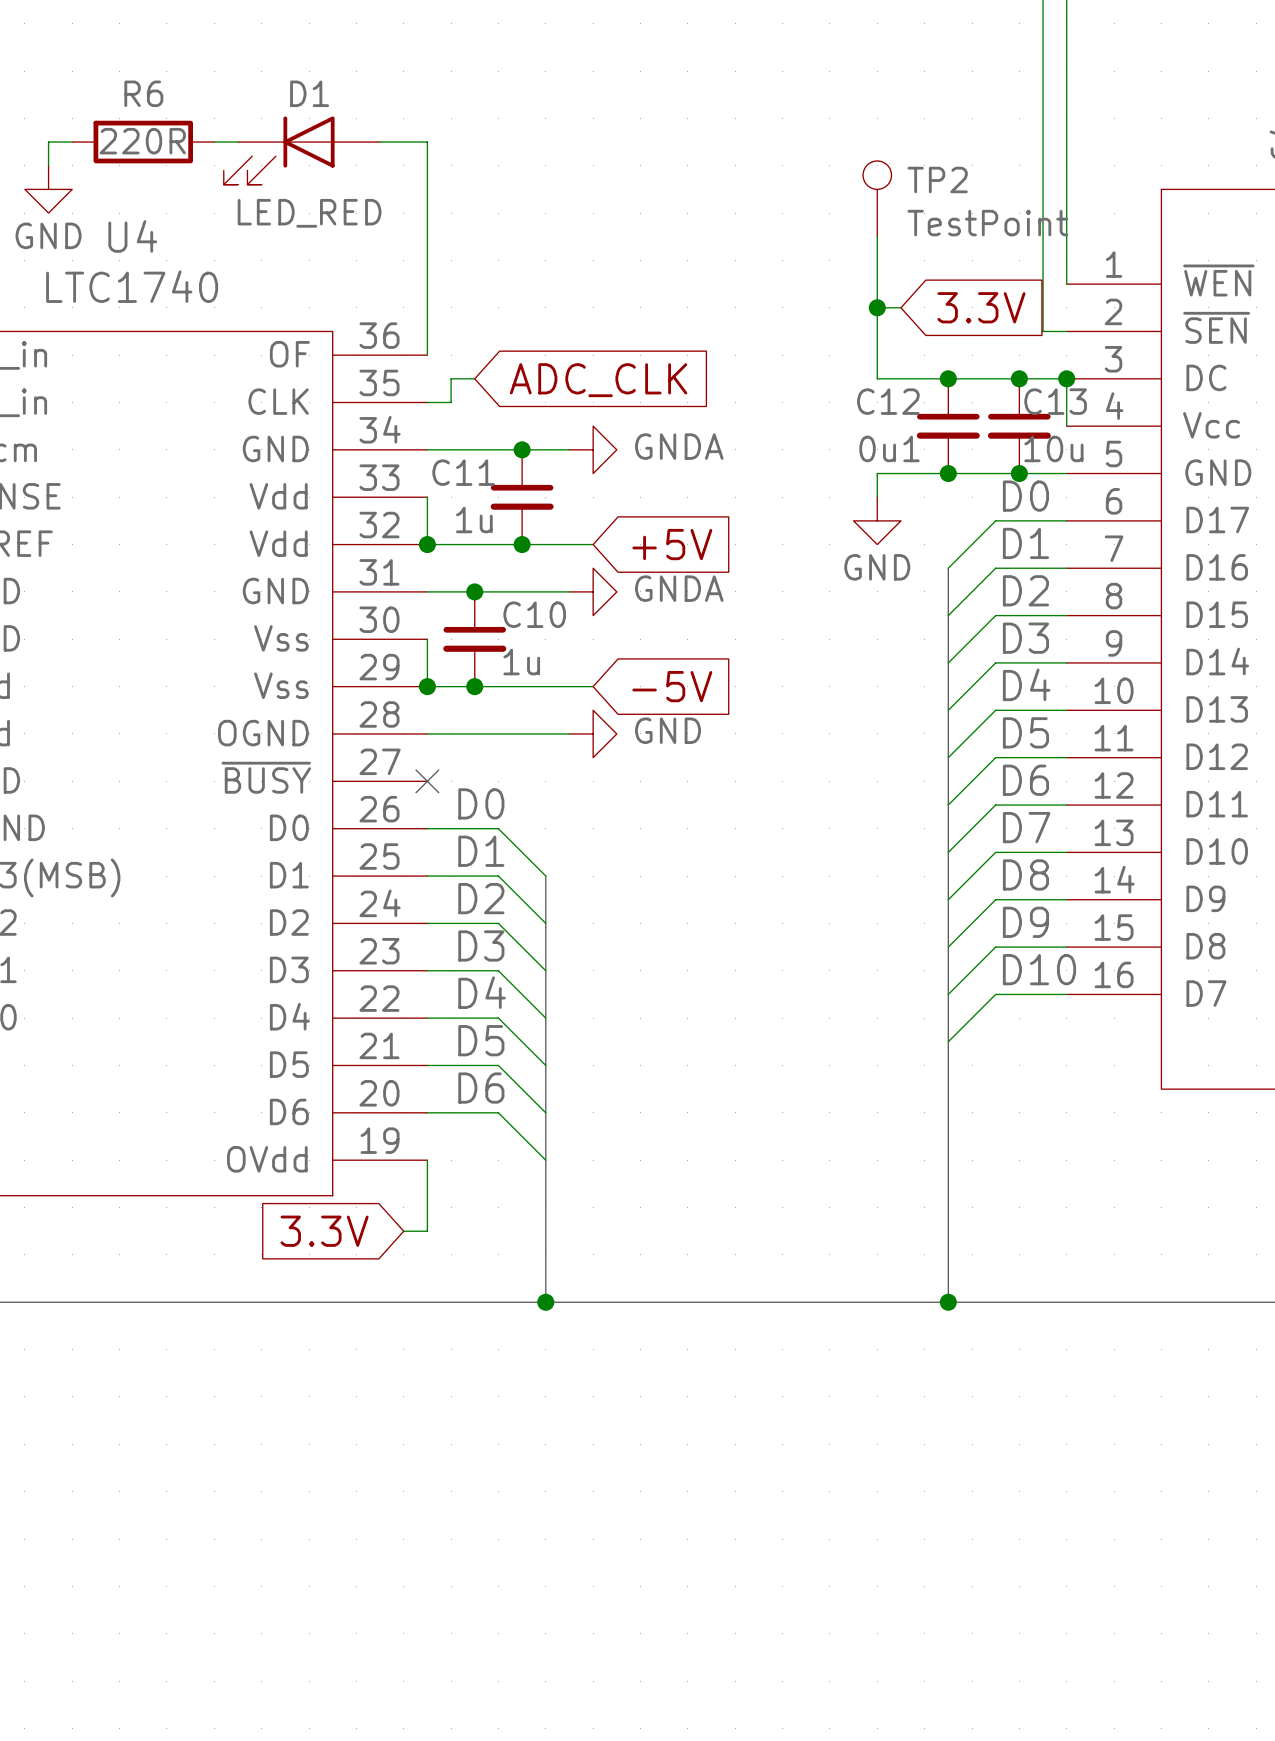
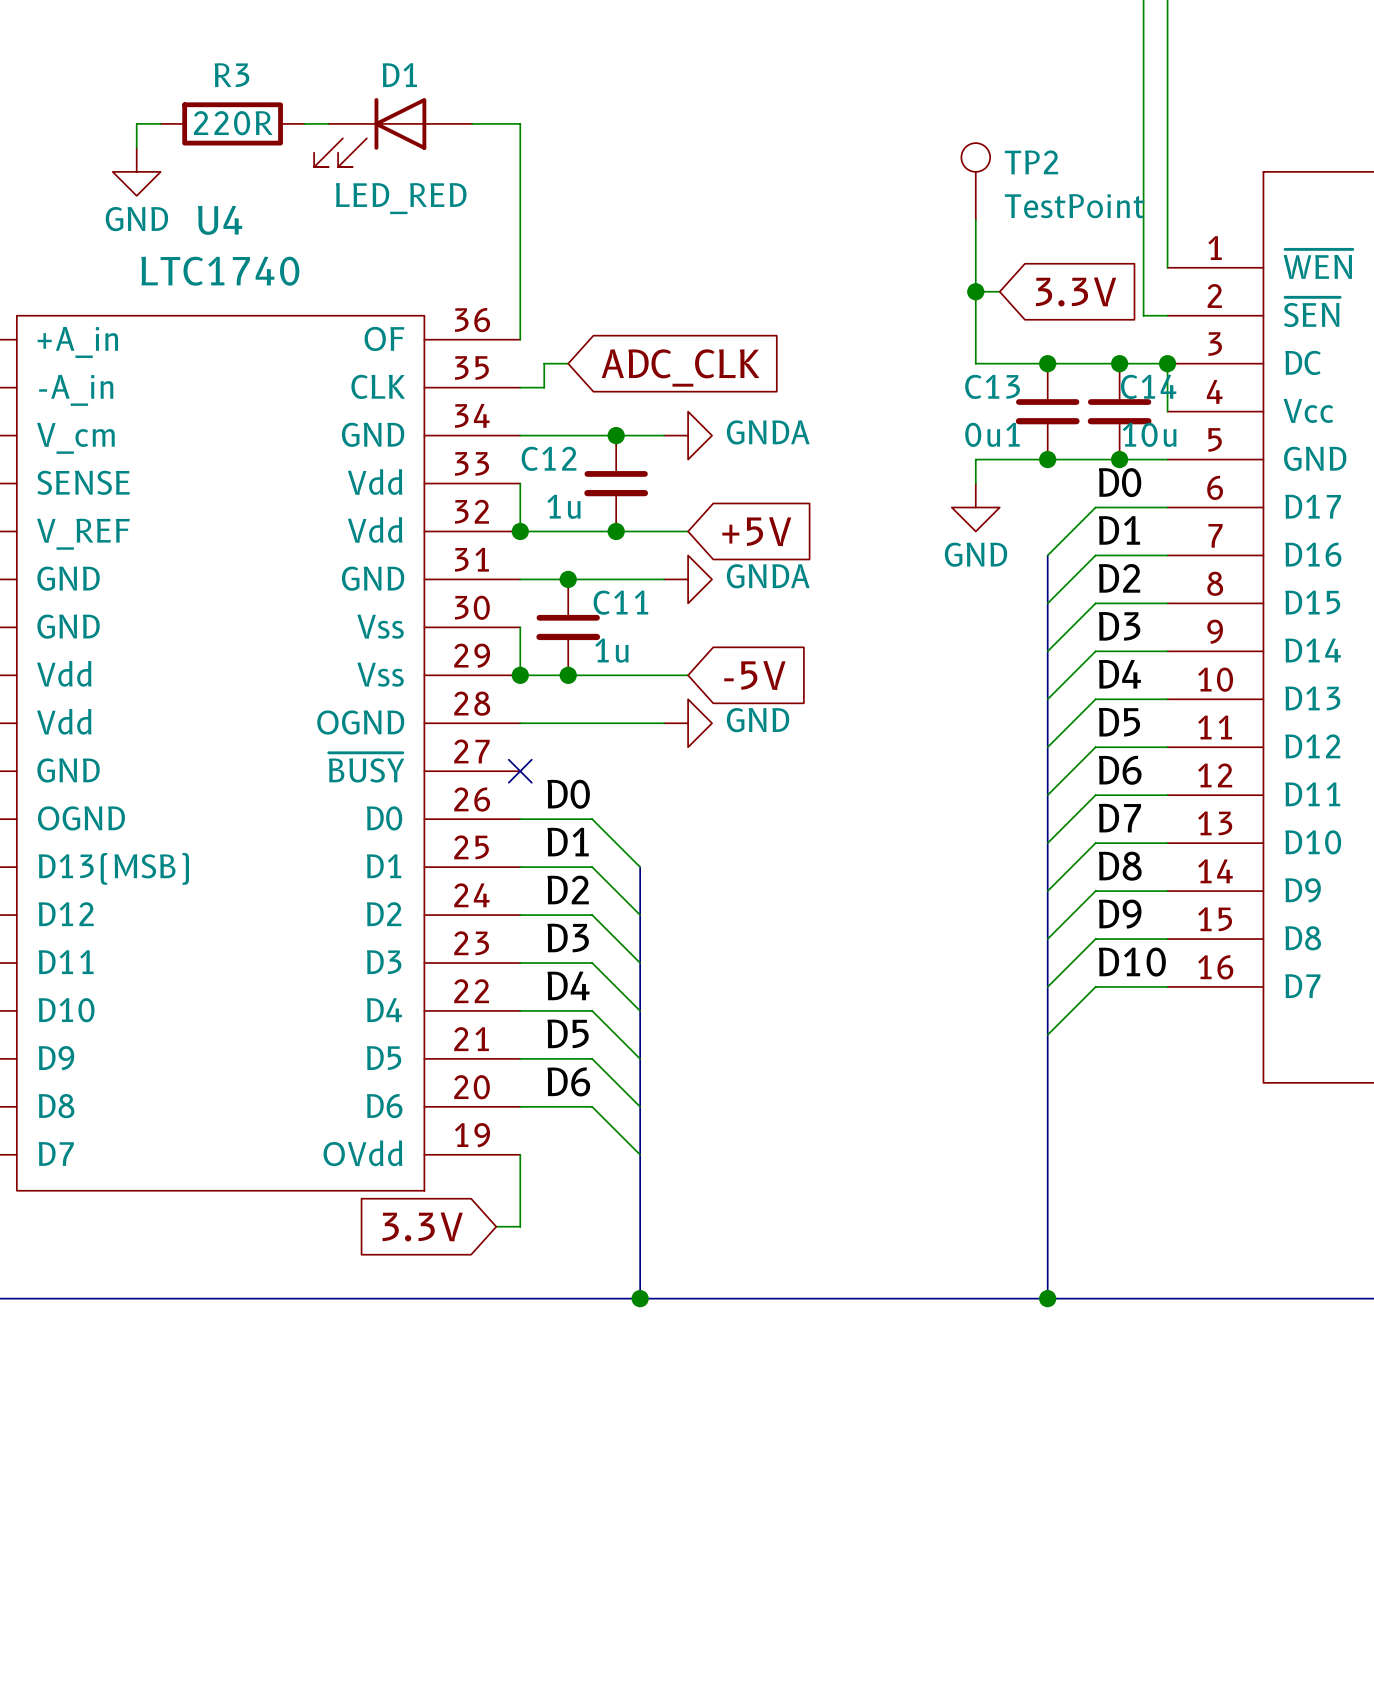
R6 name: R6 (143, 93) -> R3 (231, 75)
C12 name: C12 (888, 401) -> C13 (992, 386)
C13 name: C13 (1055, 401) -> C14 (1148, 386)
C11 name: C11 (463, 472) -> C12 (549, 458)
C10 name: C10 (534, 614) -> C11 (620, 602)

